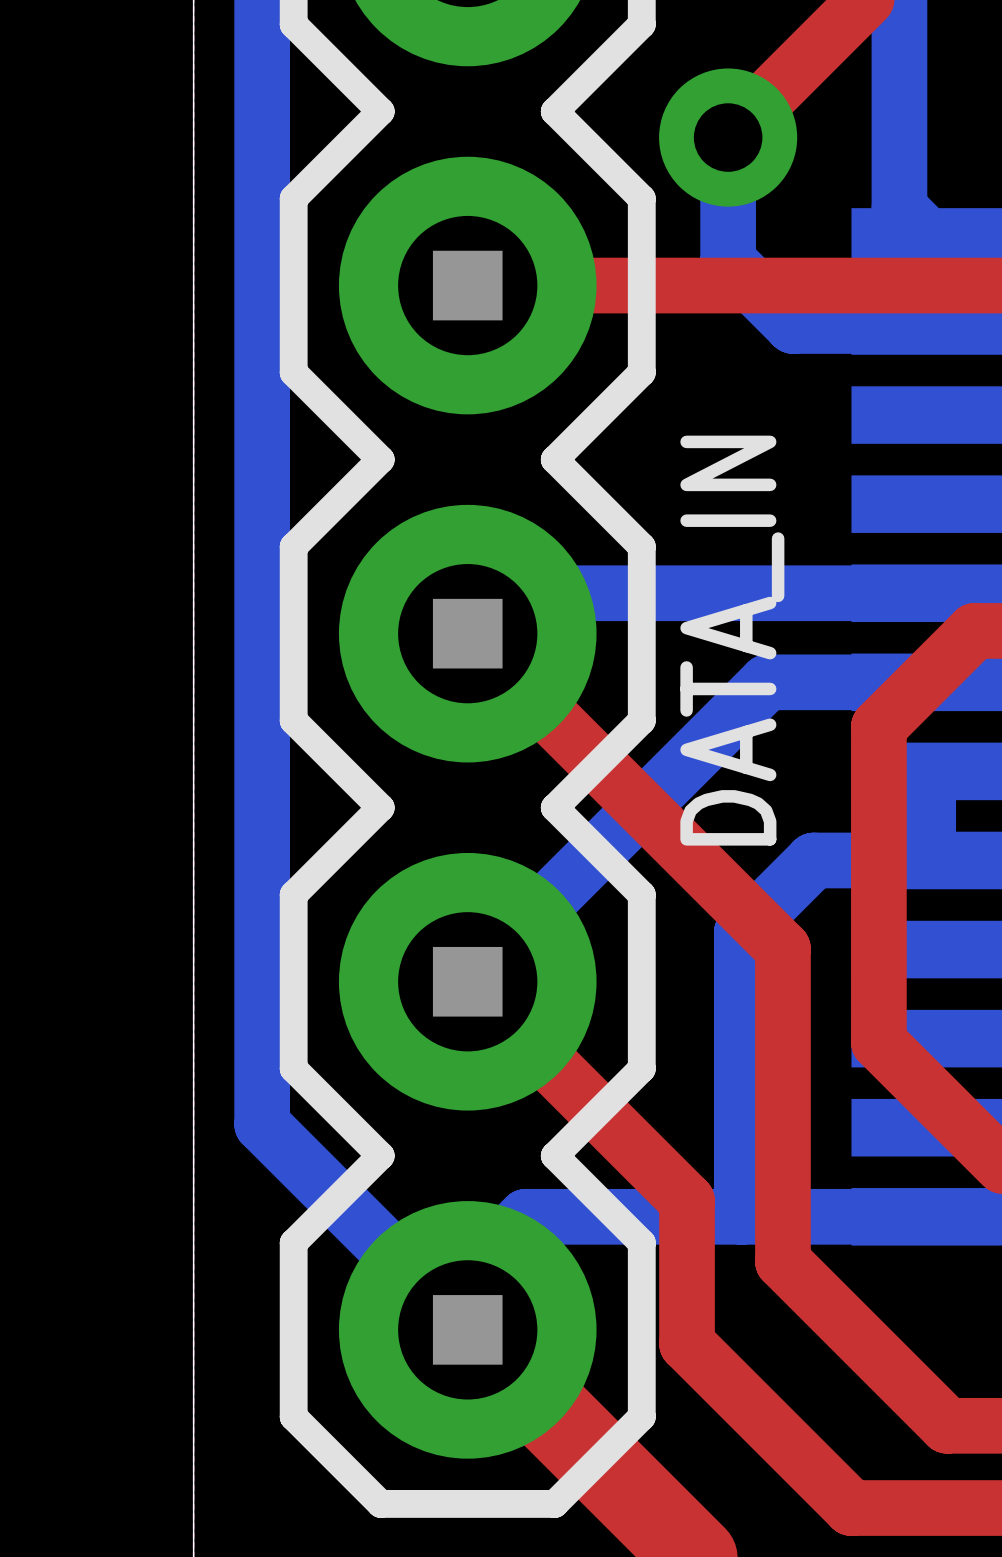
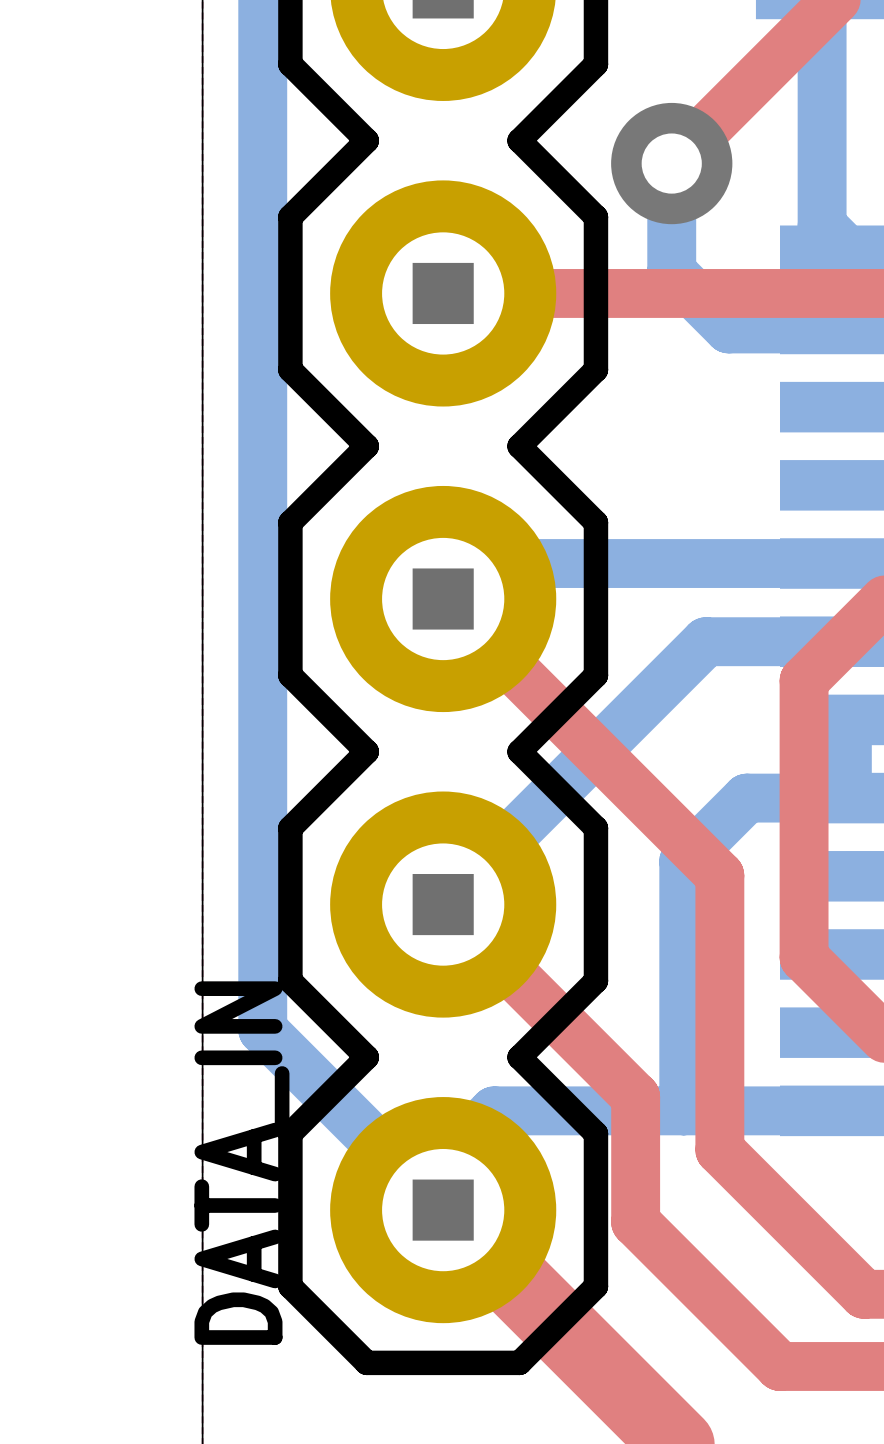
DATA_IN name position: DATA_IN (732, 640) -> DATA_IN (241, 1163)

